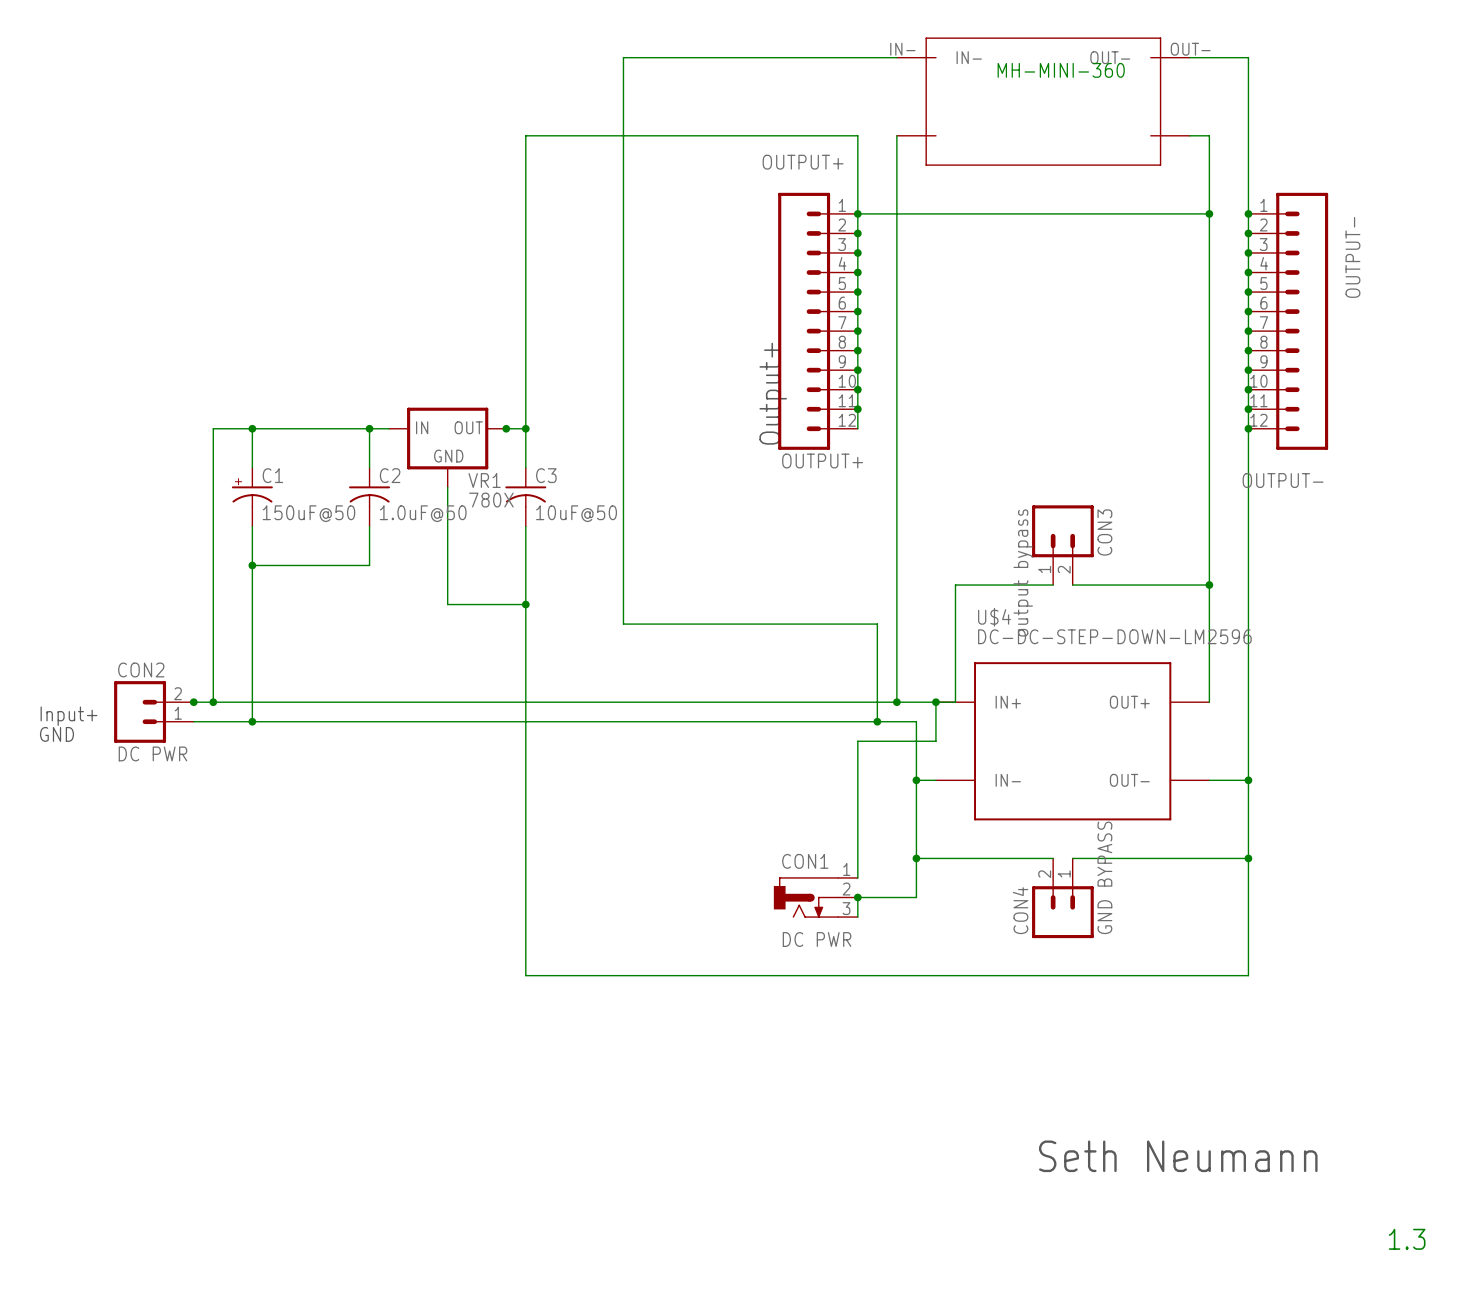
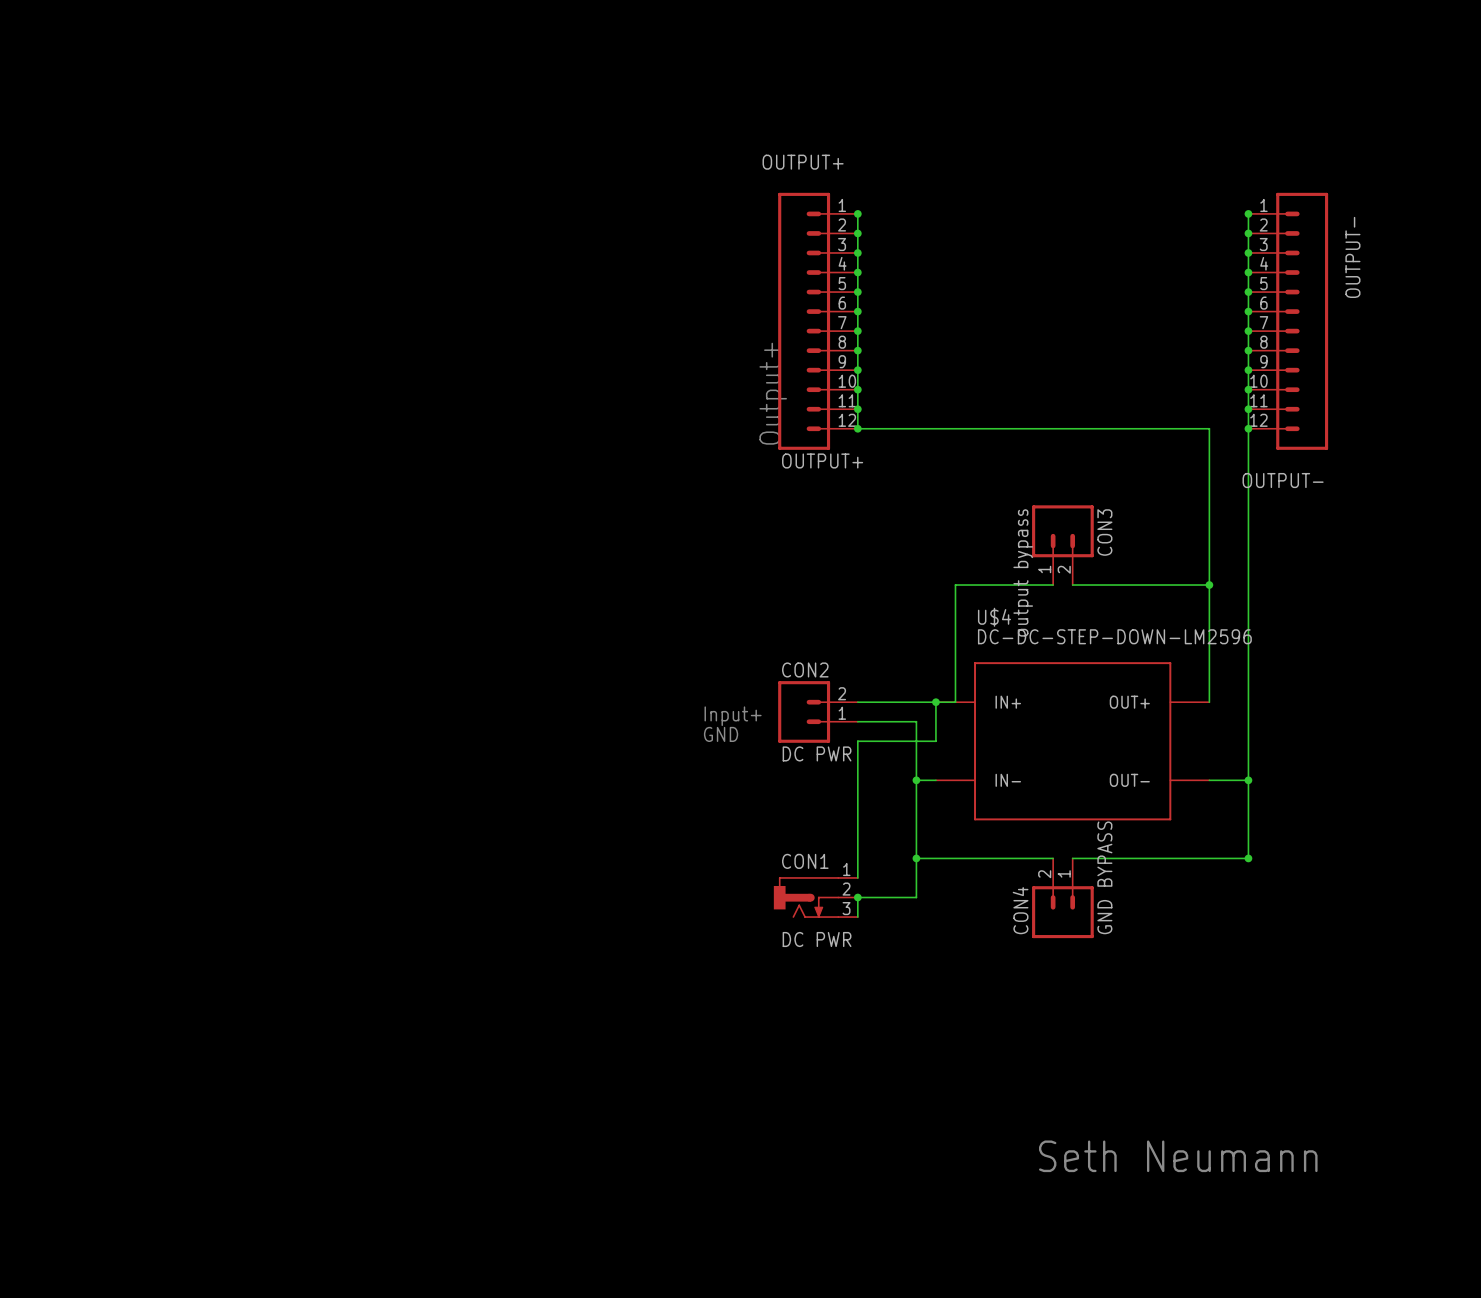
wire: (896, 57) (623, 57) (623, 624) (877, 624) (877, 721) -> none
wire: (1189, 57) (1248, 57) (1248, 213) -> none
text: MH-MINI-360 (1061, 70) -> none
part: (1043, 101) -> none
wire: (896, 135) (896, 702) -> none
wire: (1189, 135) (1209, 135) (1209, 428) -> (857, 428) (1209, 428)
wire: (1209, 213) (857, 213) (857, 135) (525, 135) (525, 467) -> none
junction: (1209, 213) -> none
wire: (252, 428) (252, 467) -> none
junction: (252, 428) -> none
wire: (369, 428) (369, 467) -> none
junction: (369, 428) -> none
wire: (389, 428) (213, 428) (213, 702) -> none
wire: (506, 428) (525, 428) -> none
junction: (506, 428) -> none
junction: (525, 428) -> none
junction: none -> (857, 428)
VR1: 780X (447, 447) -> none
wire: (447, 487) (447, 604) (525, 604) -> none
C1: 150uF@50 (252, 497) -> none
C2: 1.0uF@50 (369, 497) -> none
C3: 10uF@50 (525, 497) -> none
wire: (252, 526) (252, 721) -> none
wire: (369, 526) (369, 565) (252, 565) -> none
wire: (525, 526) (525, 975) (1248, 975) (1248, 858) -> none
junction: (252, 565) -> none
junction: (525, 604) -> none
wire: (193, 702) (857, 702) -> none
junction: (193, 702) -> none
junction: (213, 702) -> none
junction: (896, 702) -> none
CON2 position: (153, 711) -> (817, 711)
text: Input+ (69, 716) -> none
text: none -> Input+ (733, 716)
wire: (193, 721) (857, 721) -> none
junction: (252, 721) -> none
junction: (877, 721) -> none
text: GND (56, 734) -> none
text: none -> GND (721, 734)
text: 1.3 (1407, 1239) -> none

